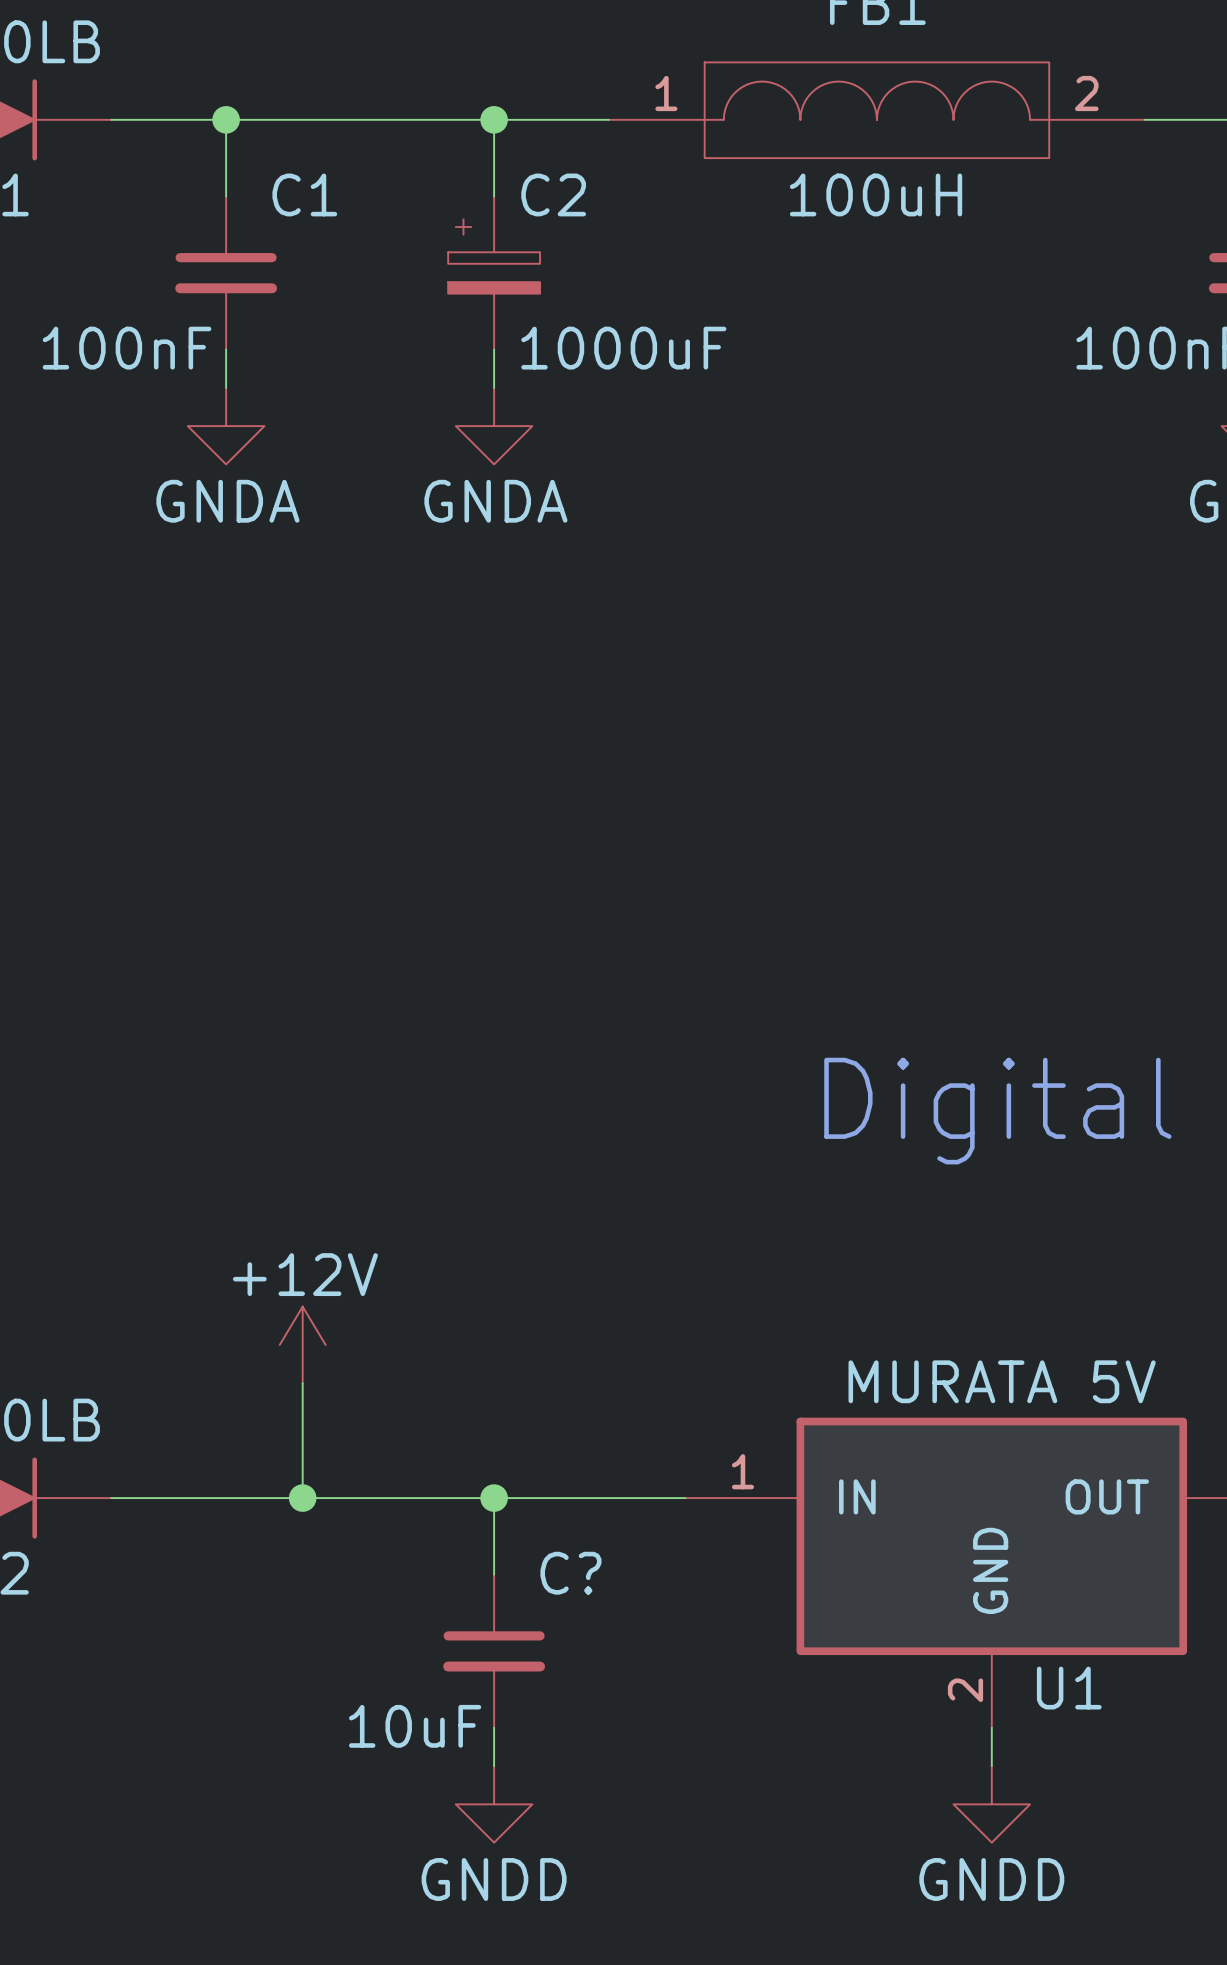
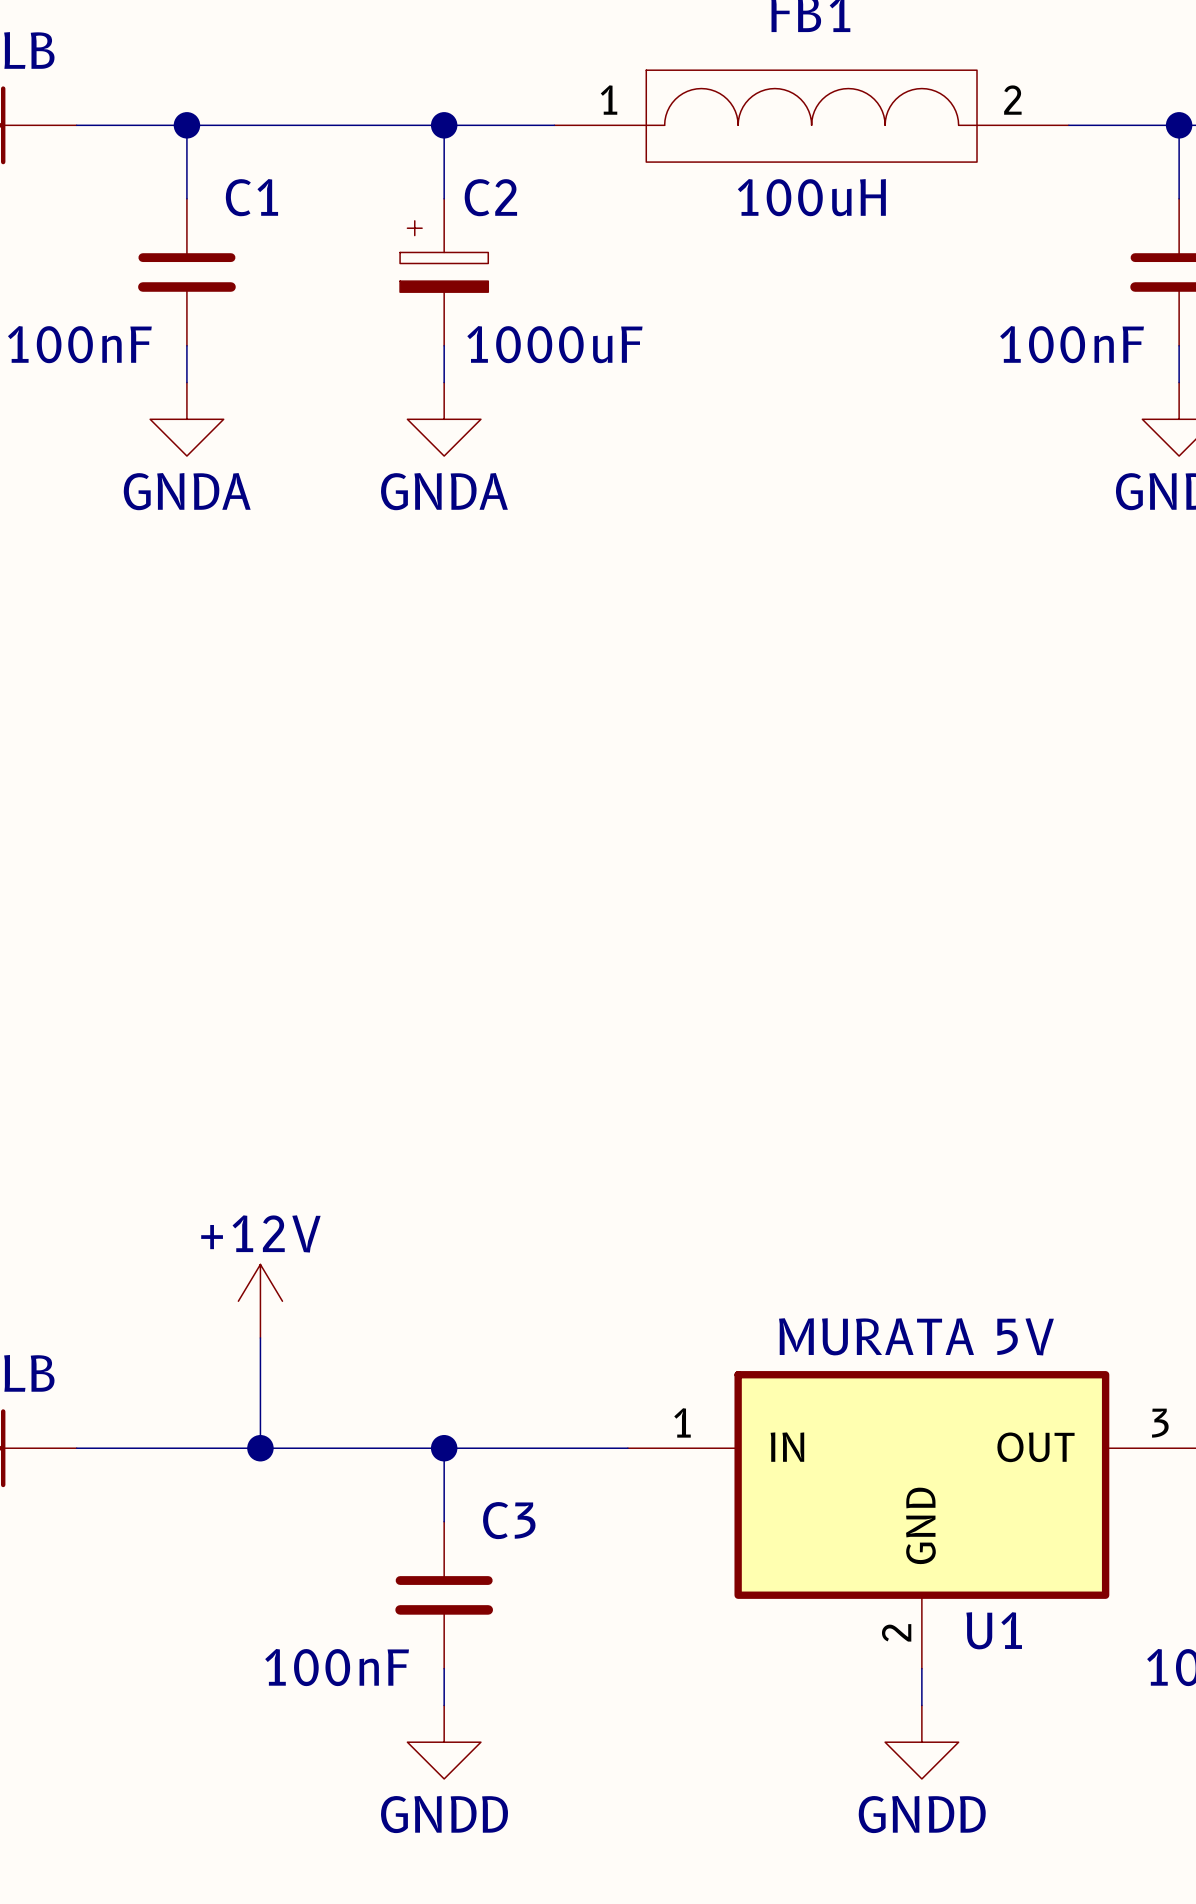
text: Digital (997, 1111) -> none
C? name: C? (570, 1573) -> C3 (509, 1520)
C? value: 10uF (415, 1726) -> 100nF (337, 1667)

